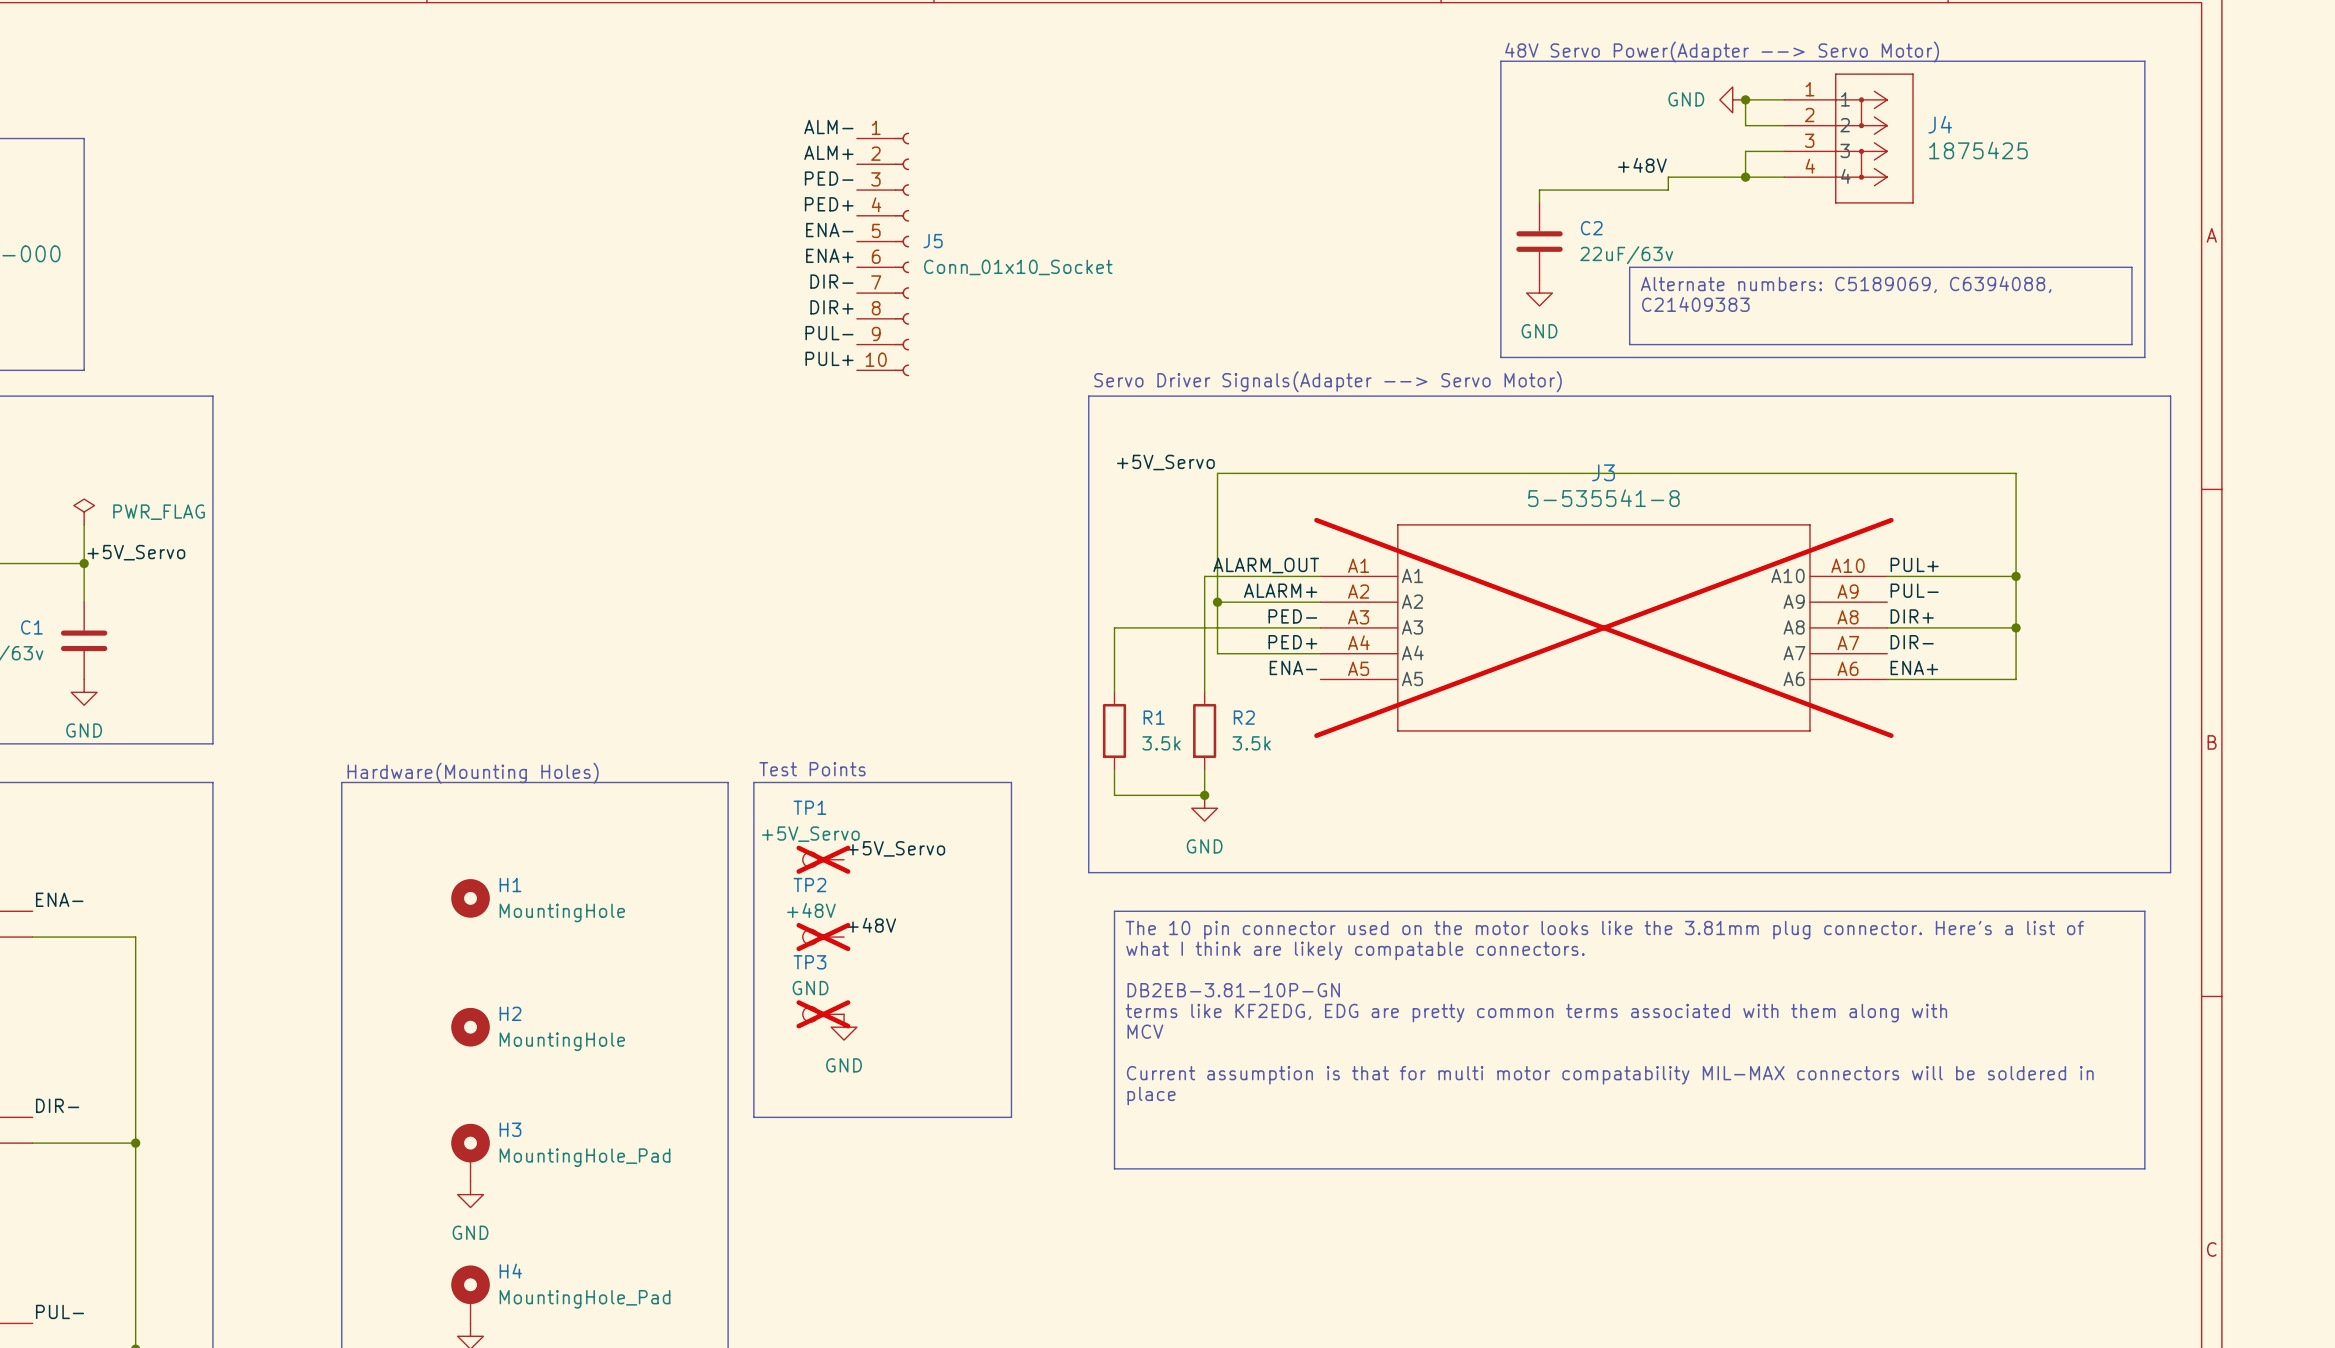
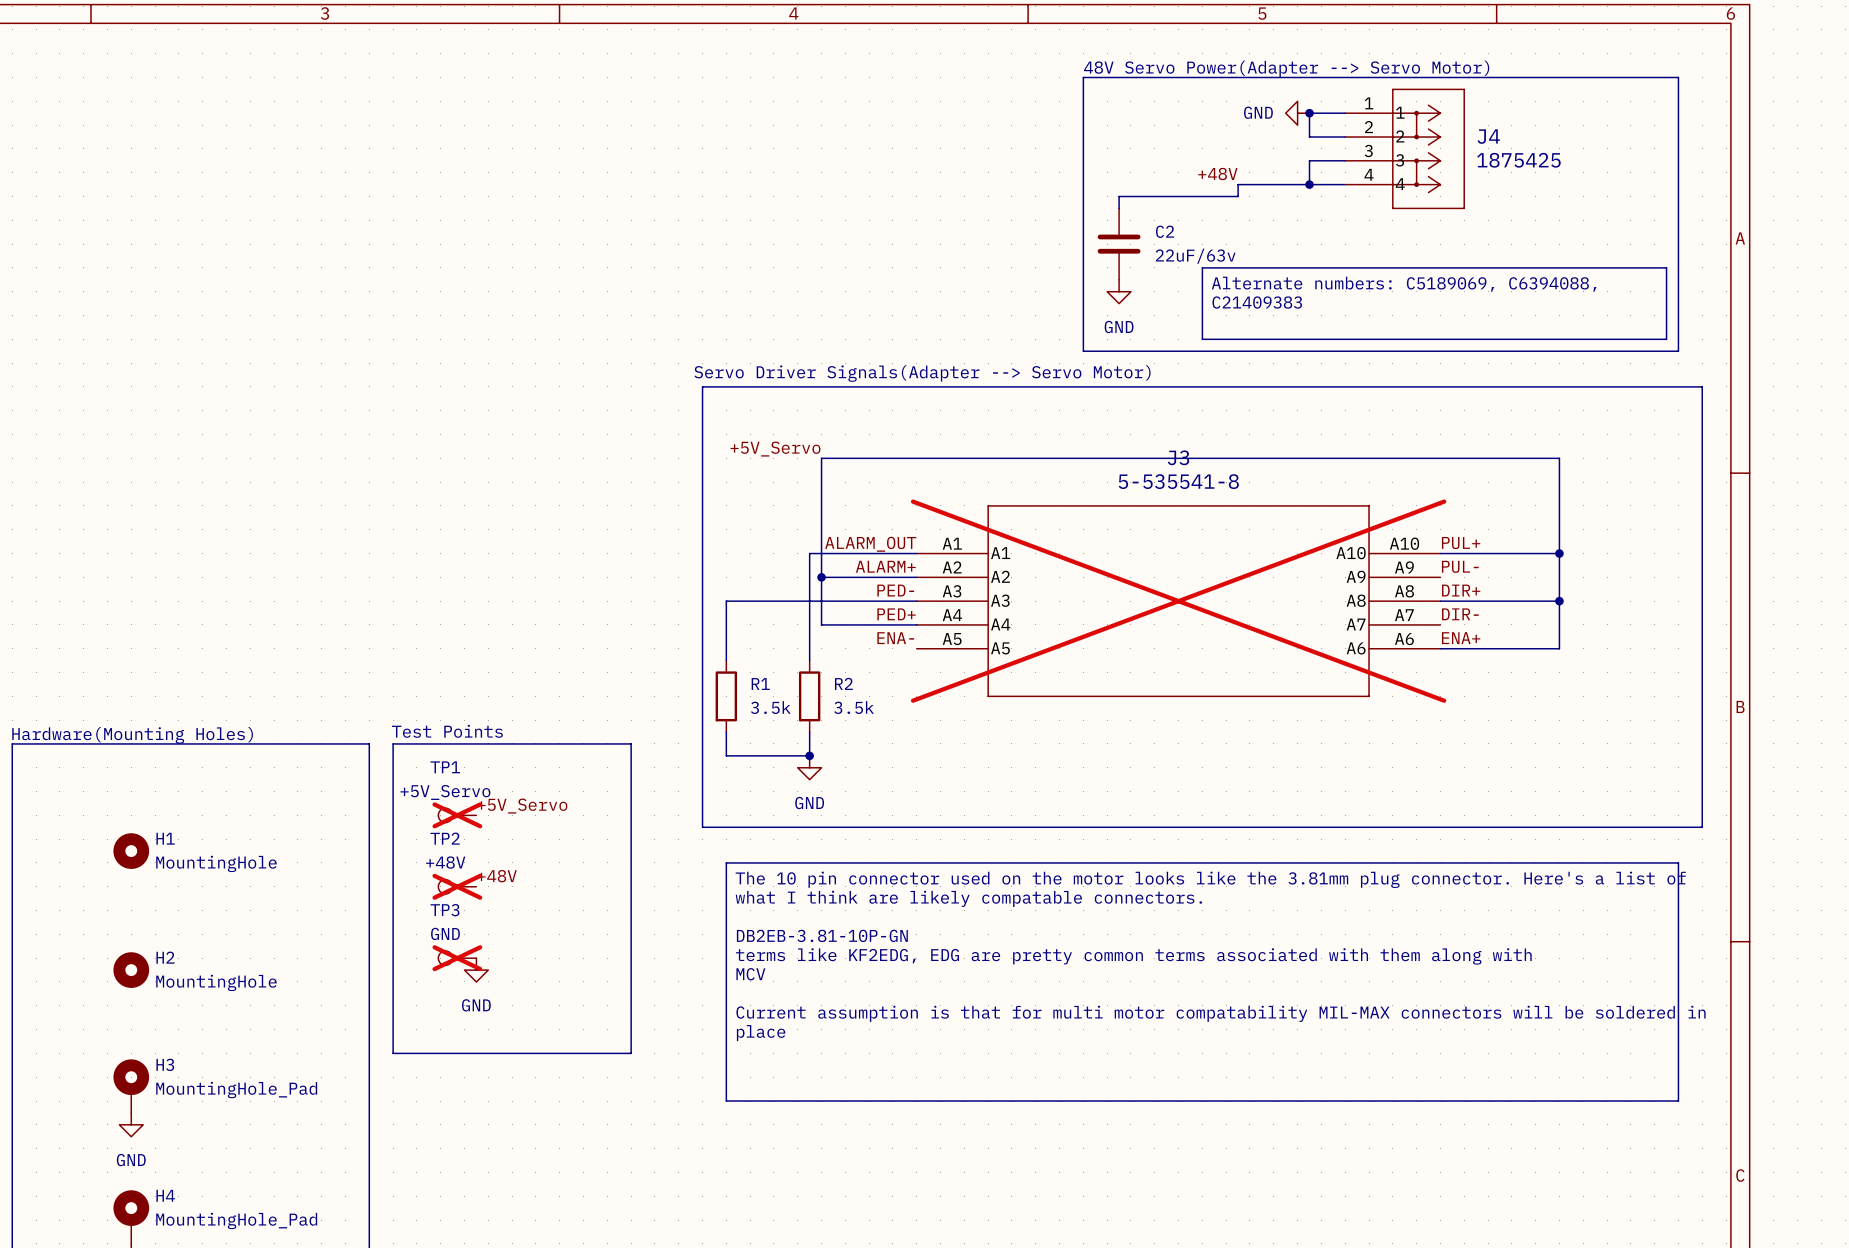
label: ALM- (828, 127) -> none
label: ALM+ (828, 152) -> none
label: PED- (829, 178) -> none
label: PED+ (829, 204) -> none
label: ENA- (829, 230) -> none
J5: Conn_01x10_Socket (883, 254) -> none
label: ENA+ (829, 255) -> none
label: DIR- (831, 281) -> none
label: DIR+ (831, 307) -> none
label: PUL- (829, 333) -> none
label: PUL+ (829, 358) -> none

